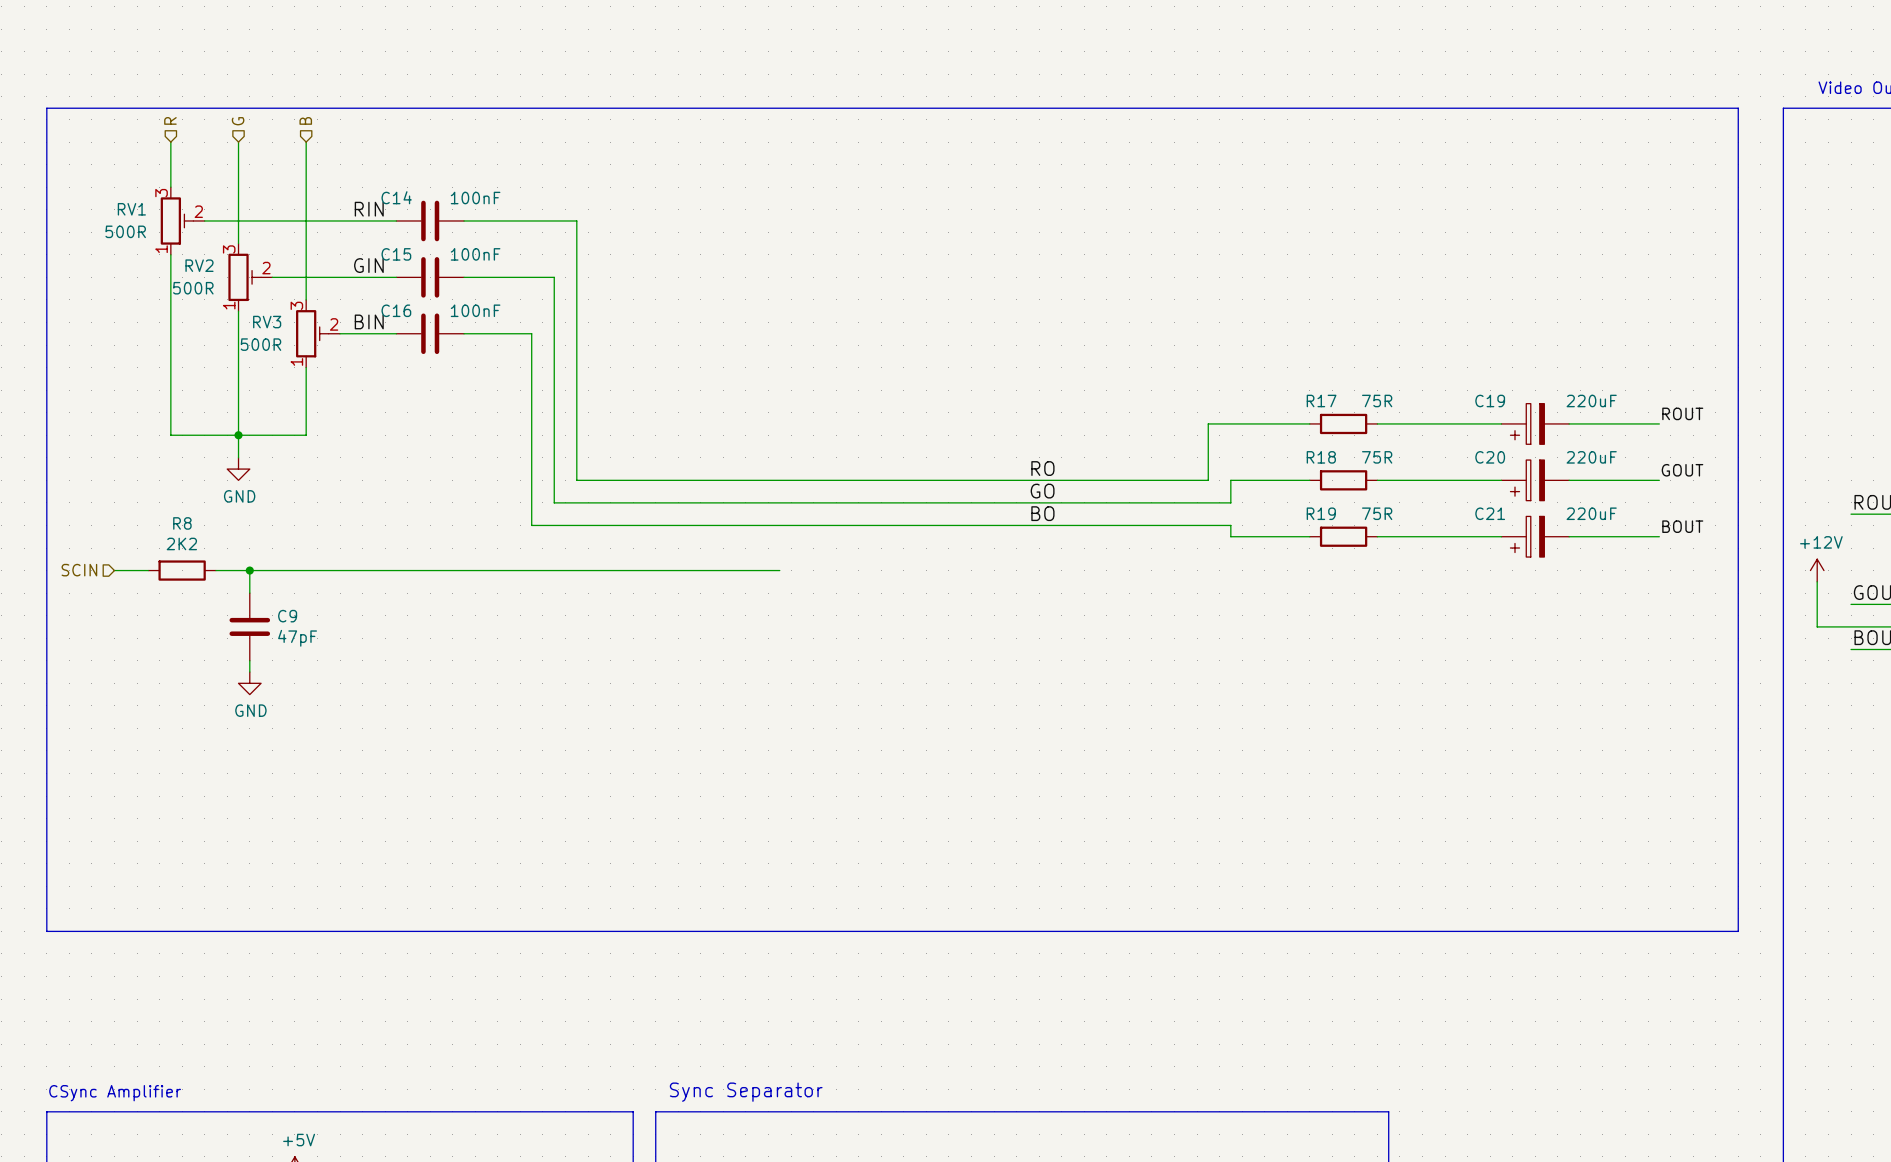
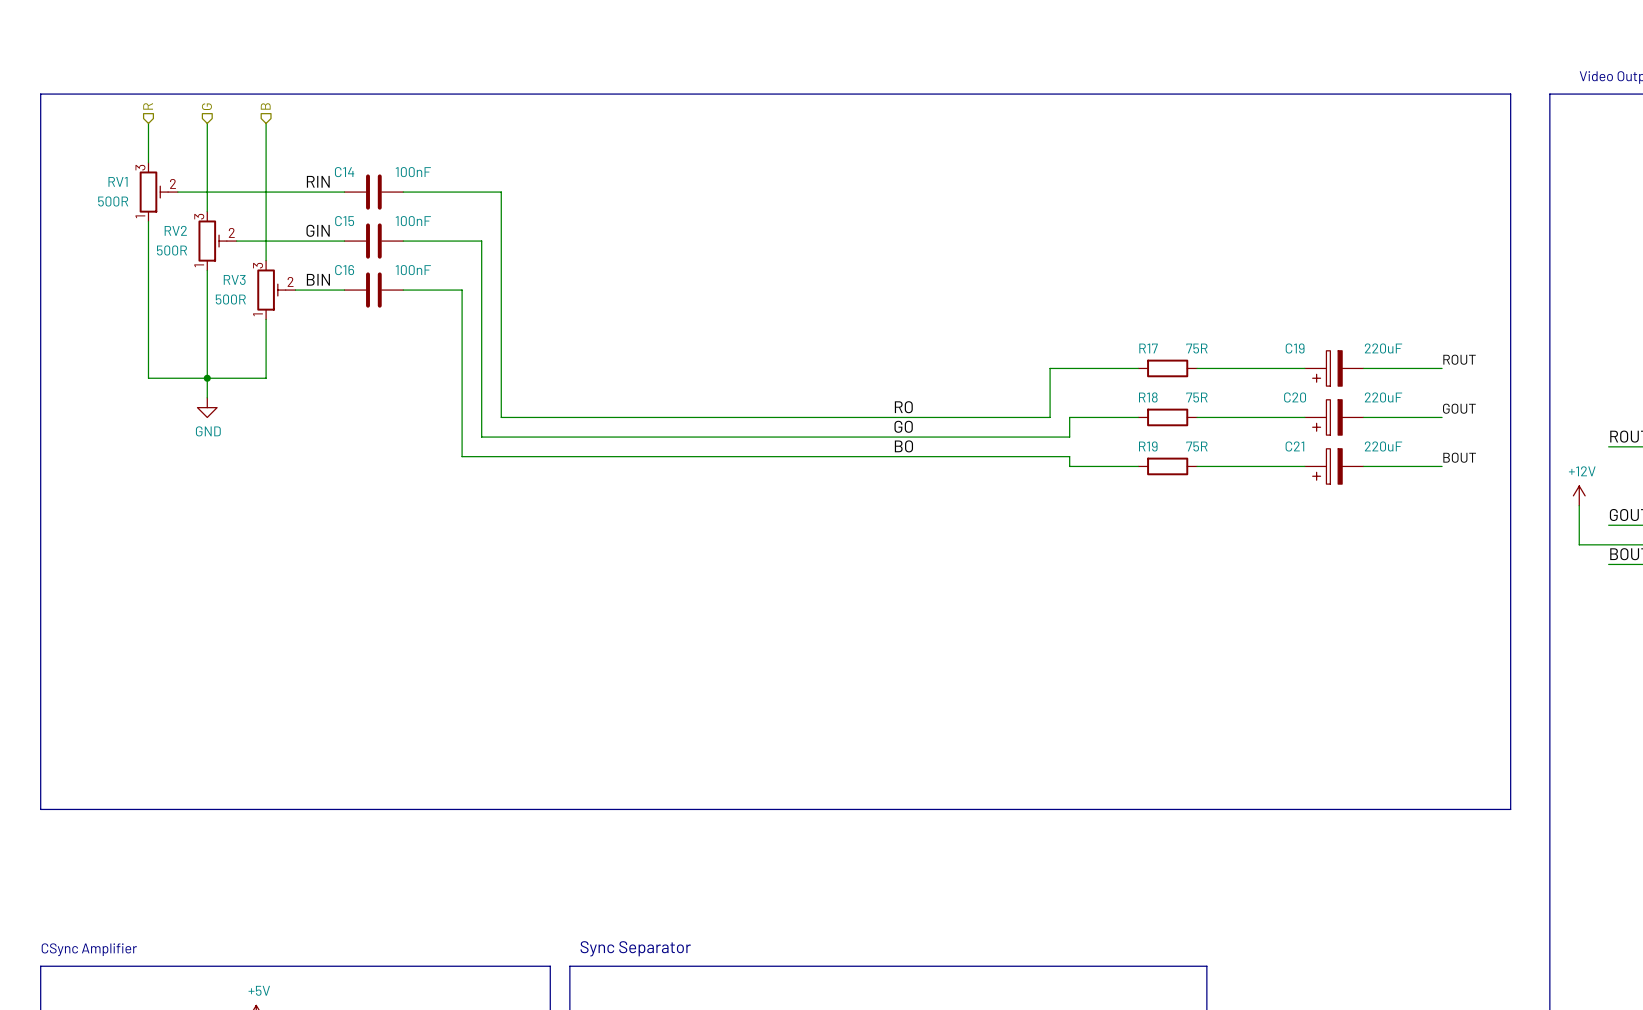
hierarchical label: SCIN (79, 570) -> none
wire: (114, 570) (148, 570) -> none
R8: 2K2 (182, 570) -> none
wire: (215, 570) (779, 570) -> none
wire: (249, 570) (249, 593) -> none
junction: (249, 570) -> none
C9: 47pF (249, 626) -> none
wire: (249, 660) (249, 672) -> none
power symbol: GND (249, 683) -> none

